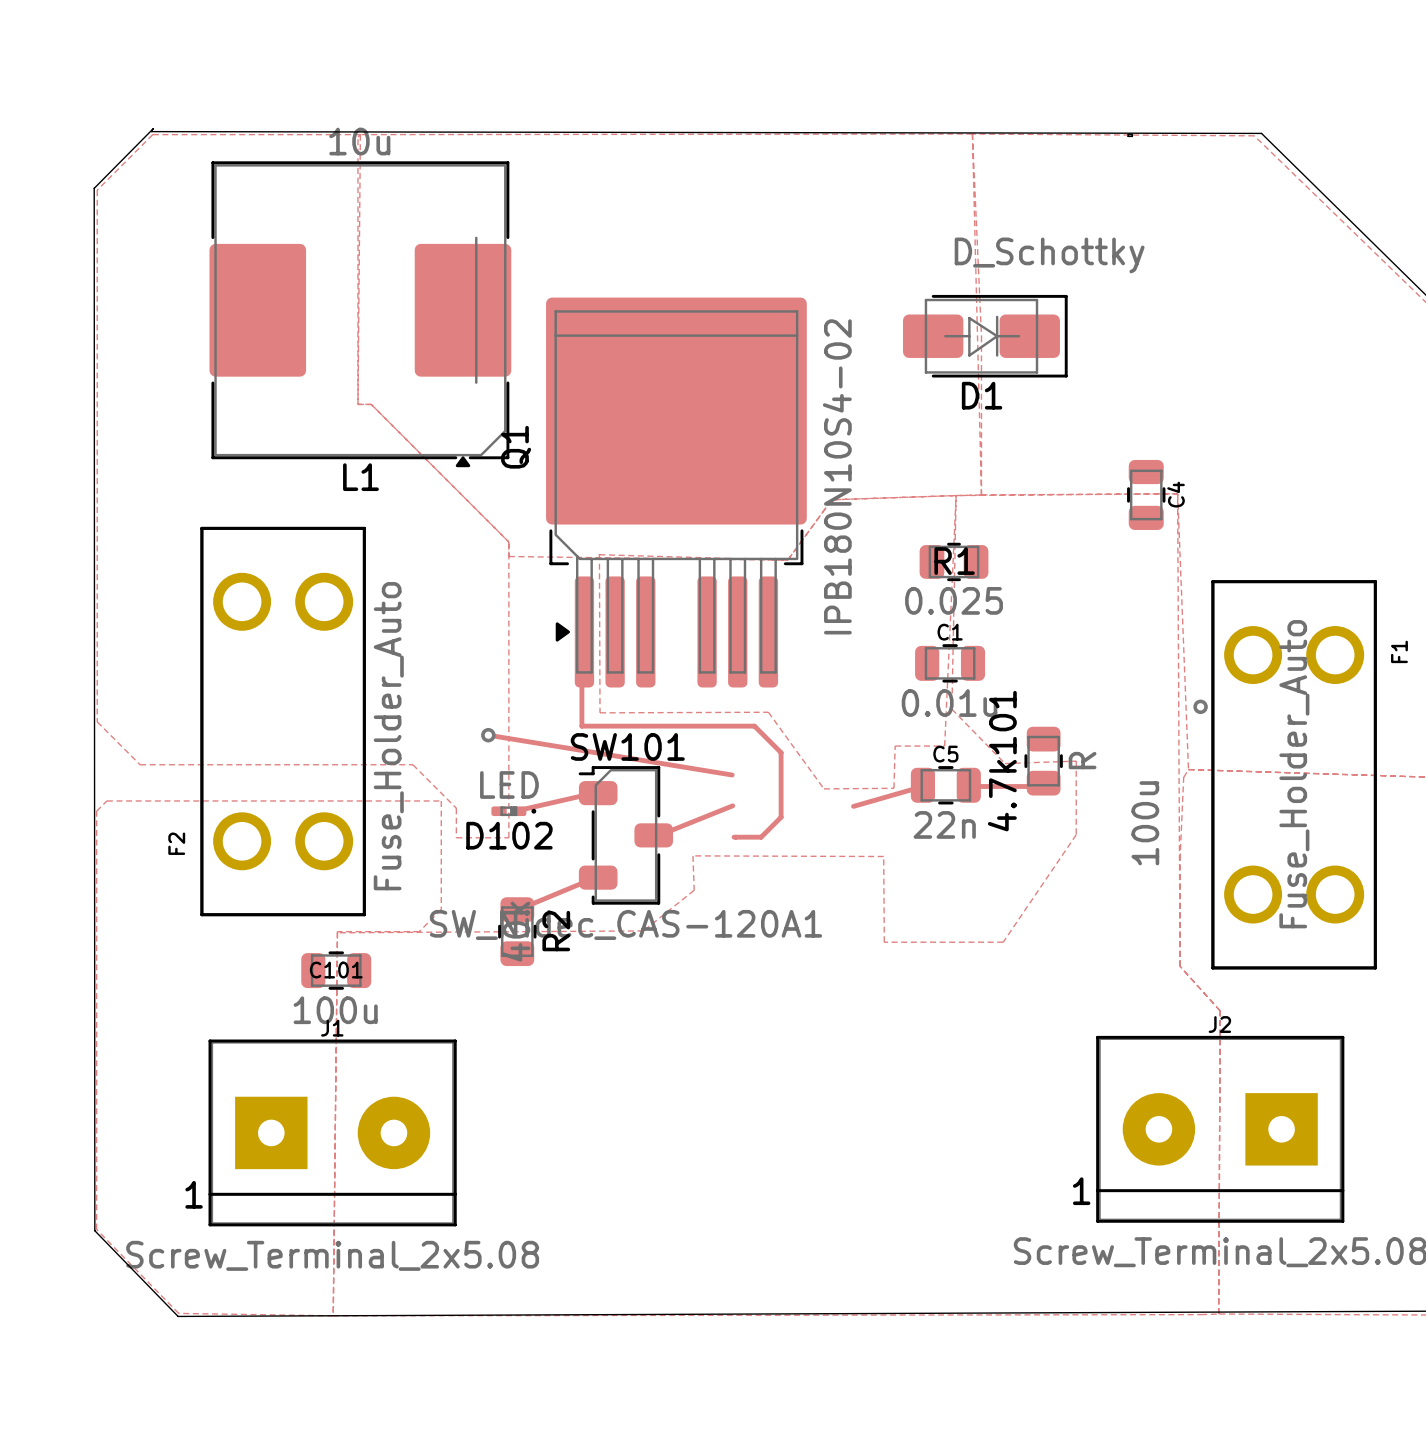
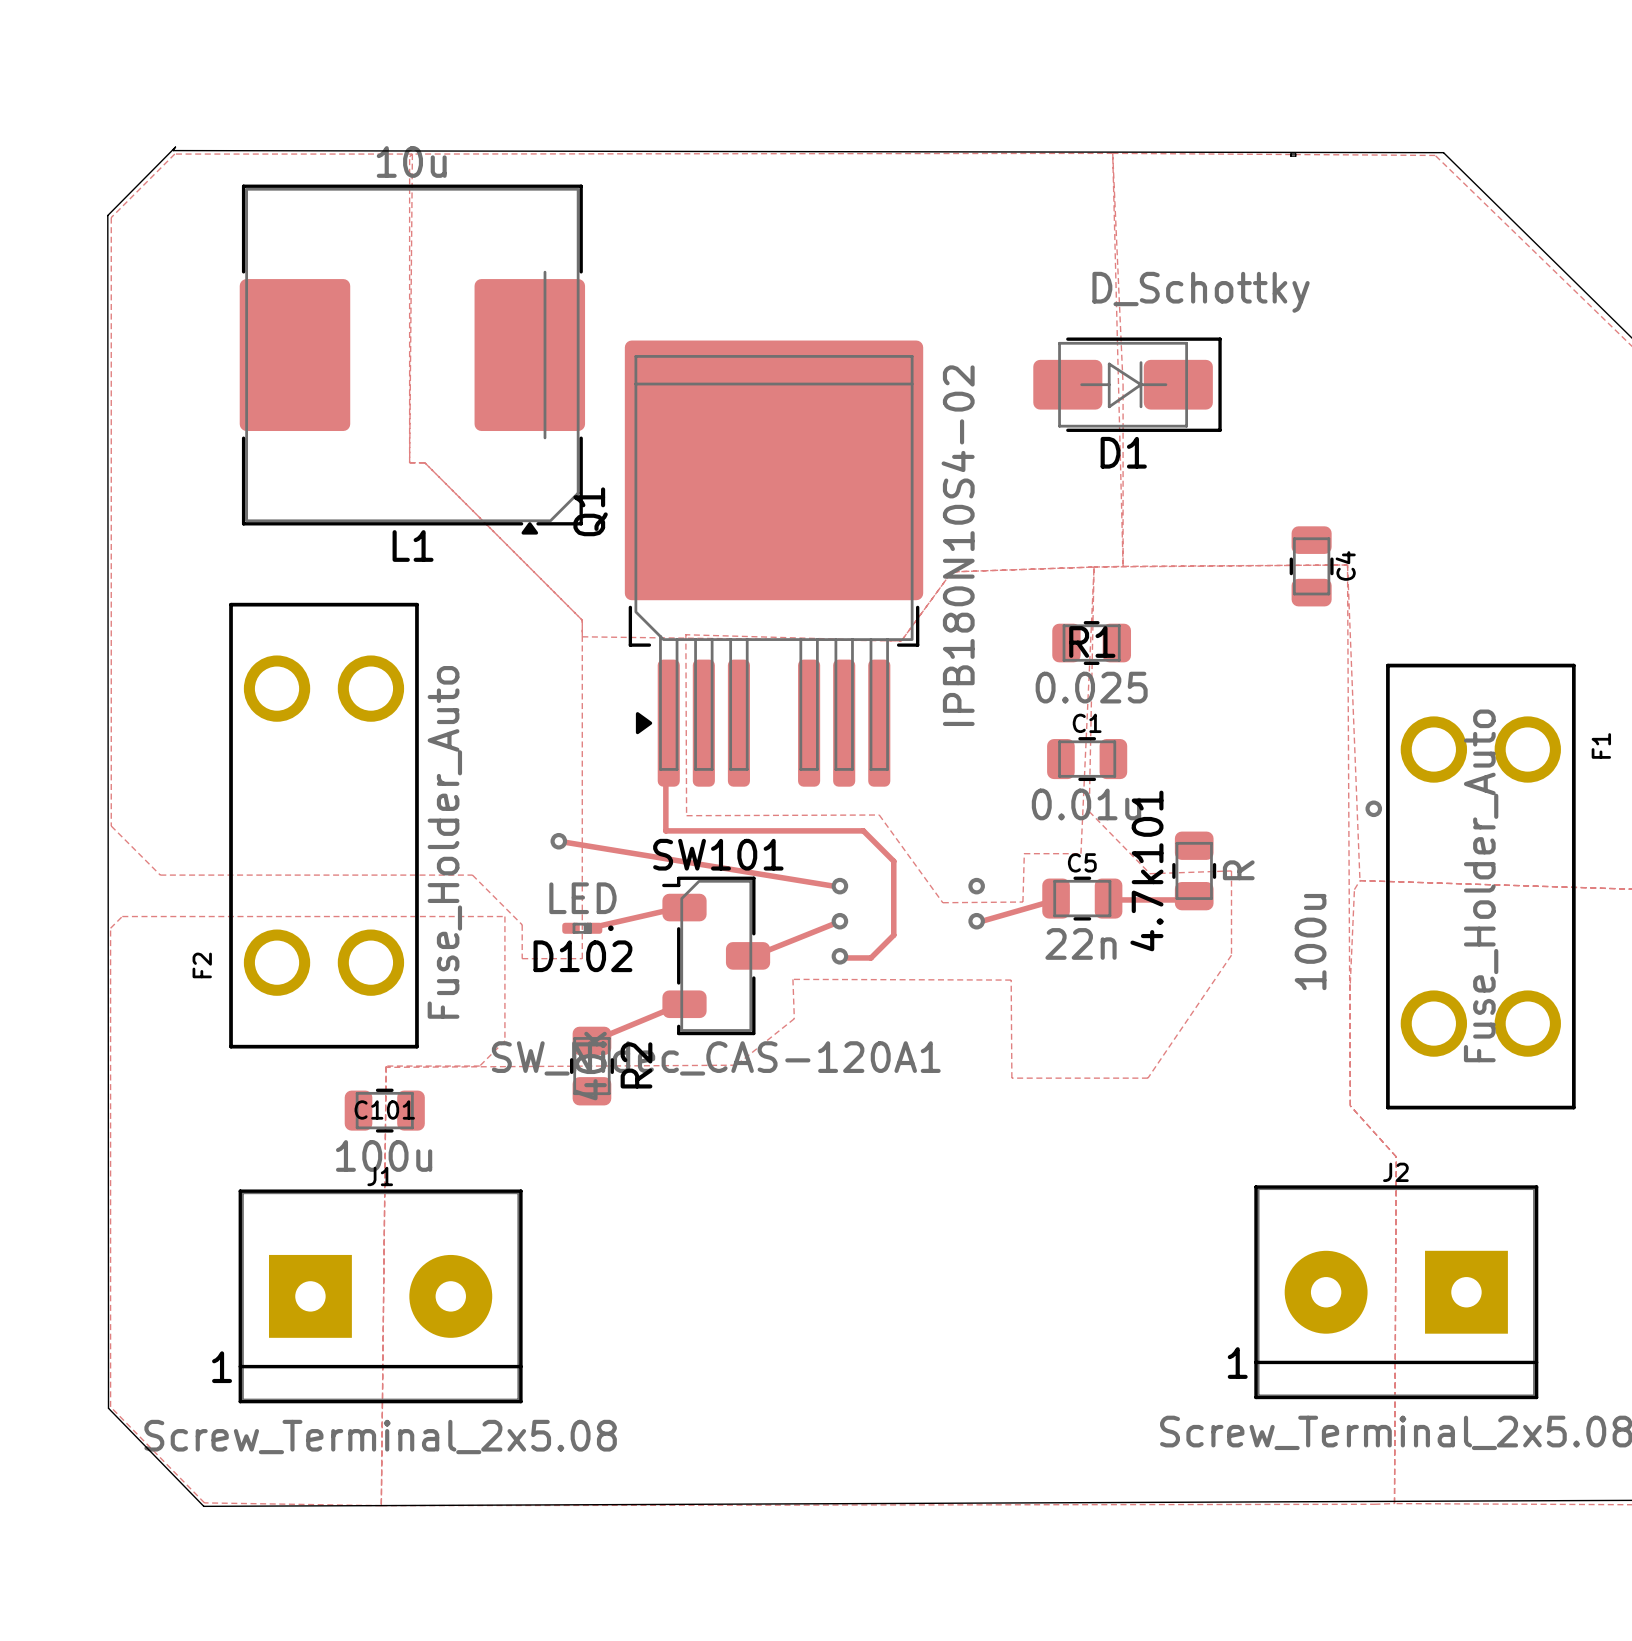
via: none -> (839, 886)
via: none -> (976, 886)
via: none -> (839, 921)
via: none -> (976, 921)
via: none -> (839, 956)

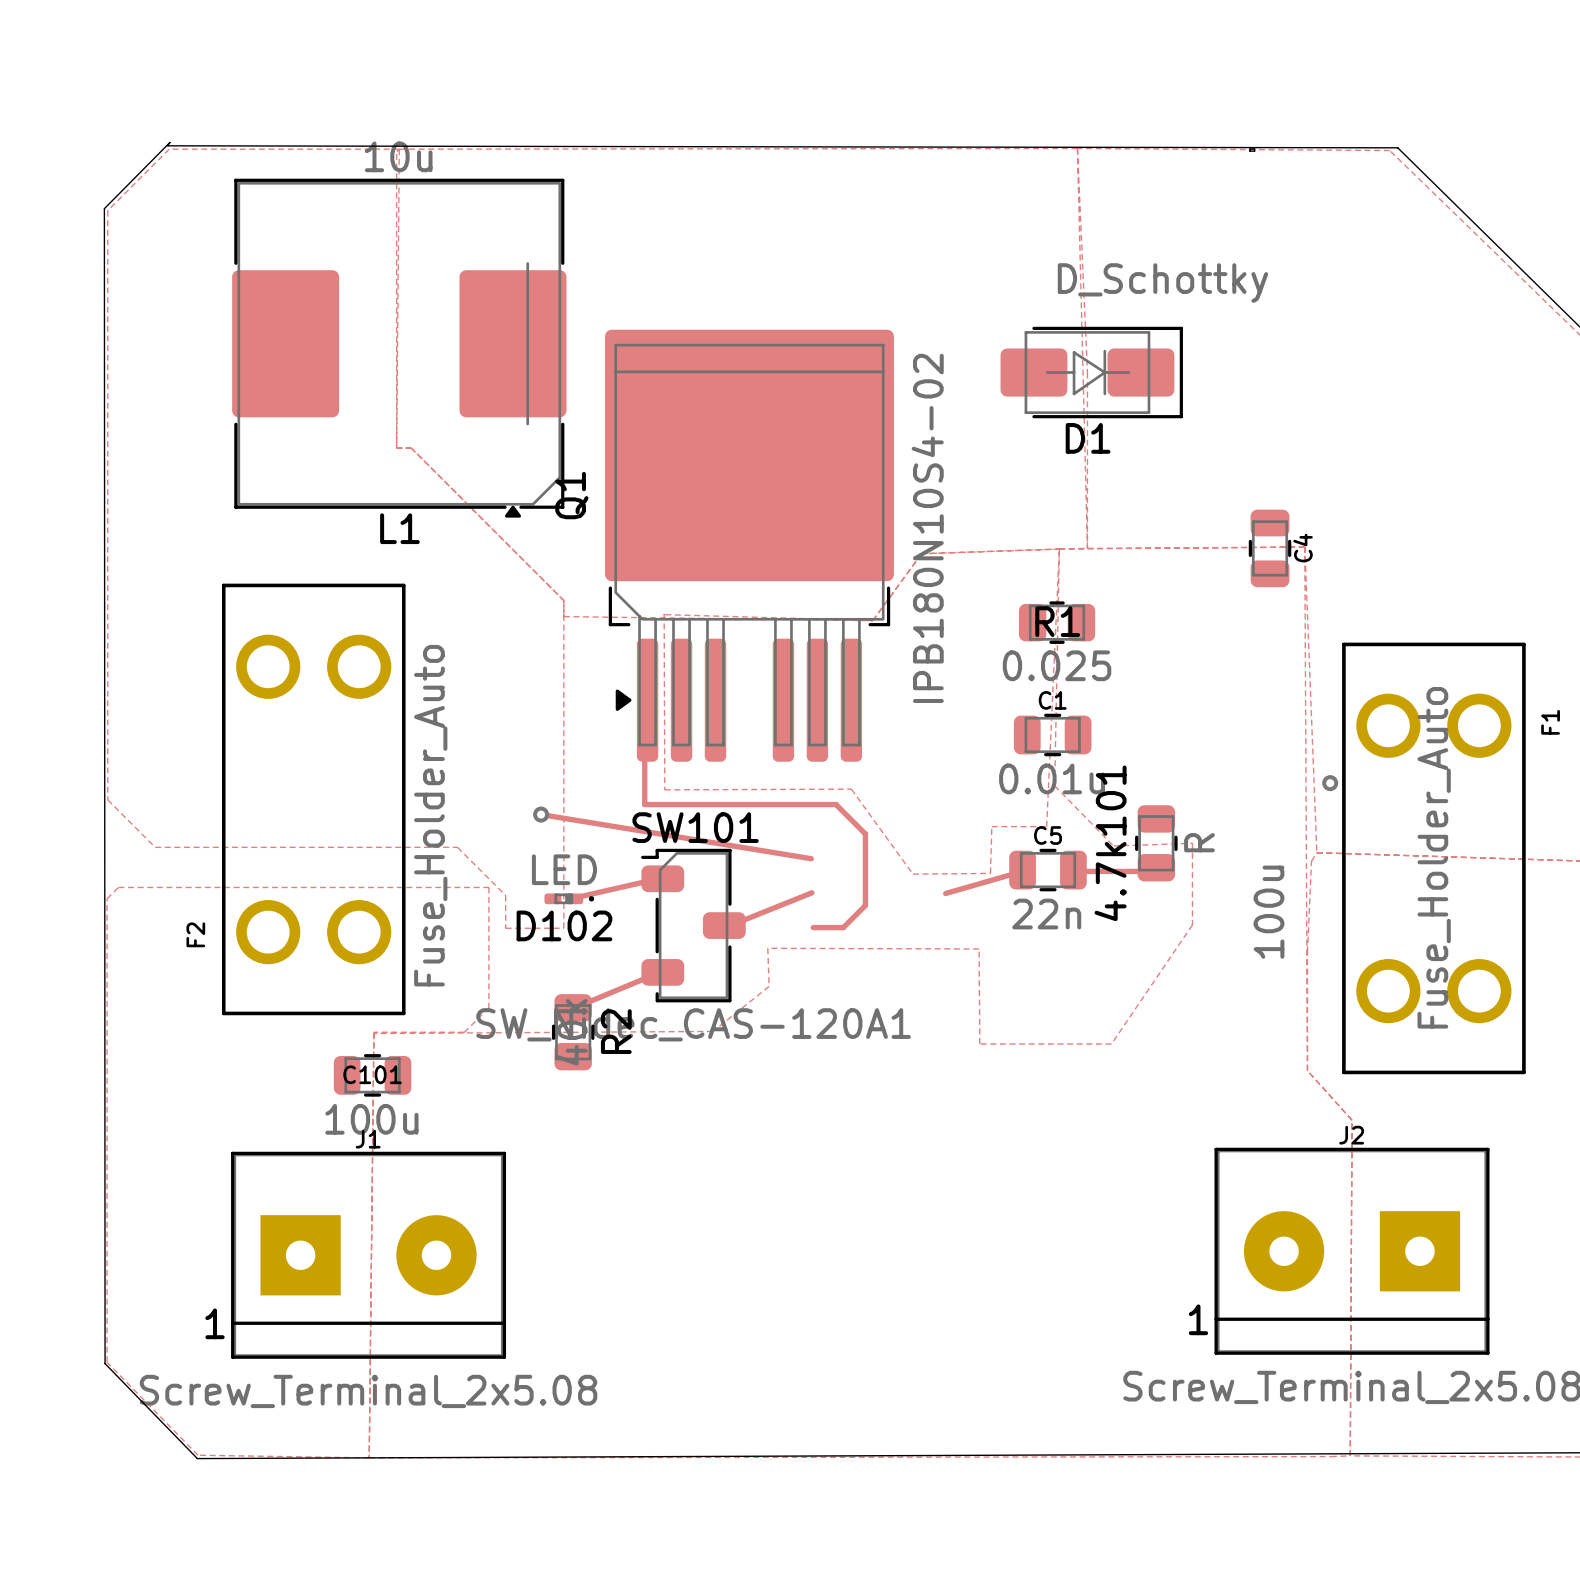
via: (839, 886) -> none
via: (976, 886) -> none
via: (839, 921) -> none
via: (976, 921) -> none
via: (839, 956) -> none

